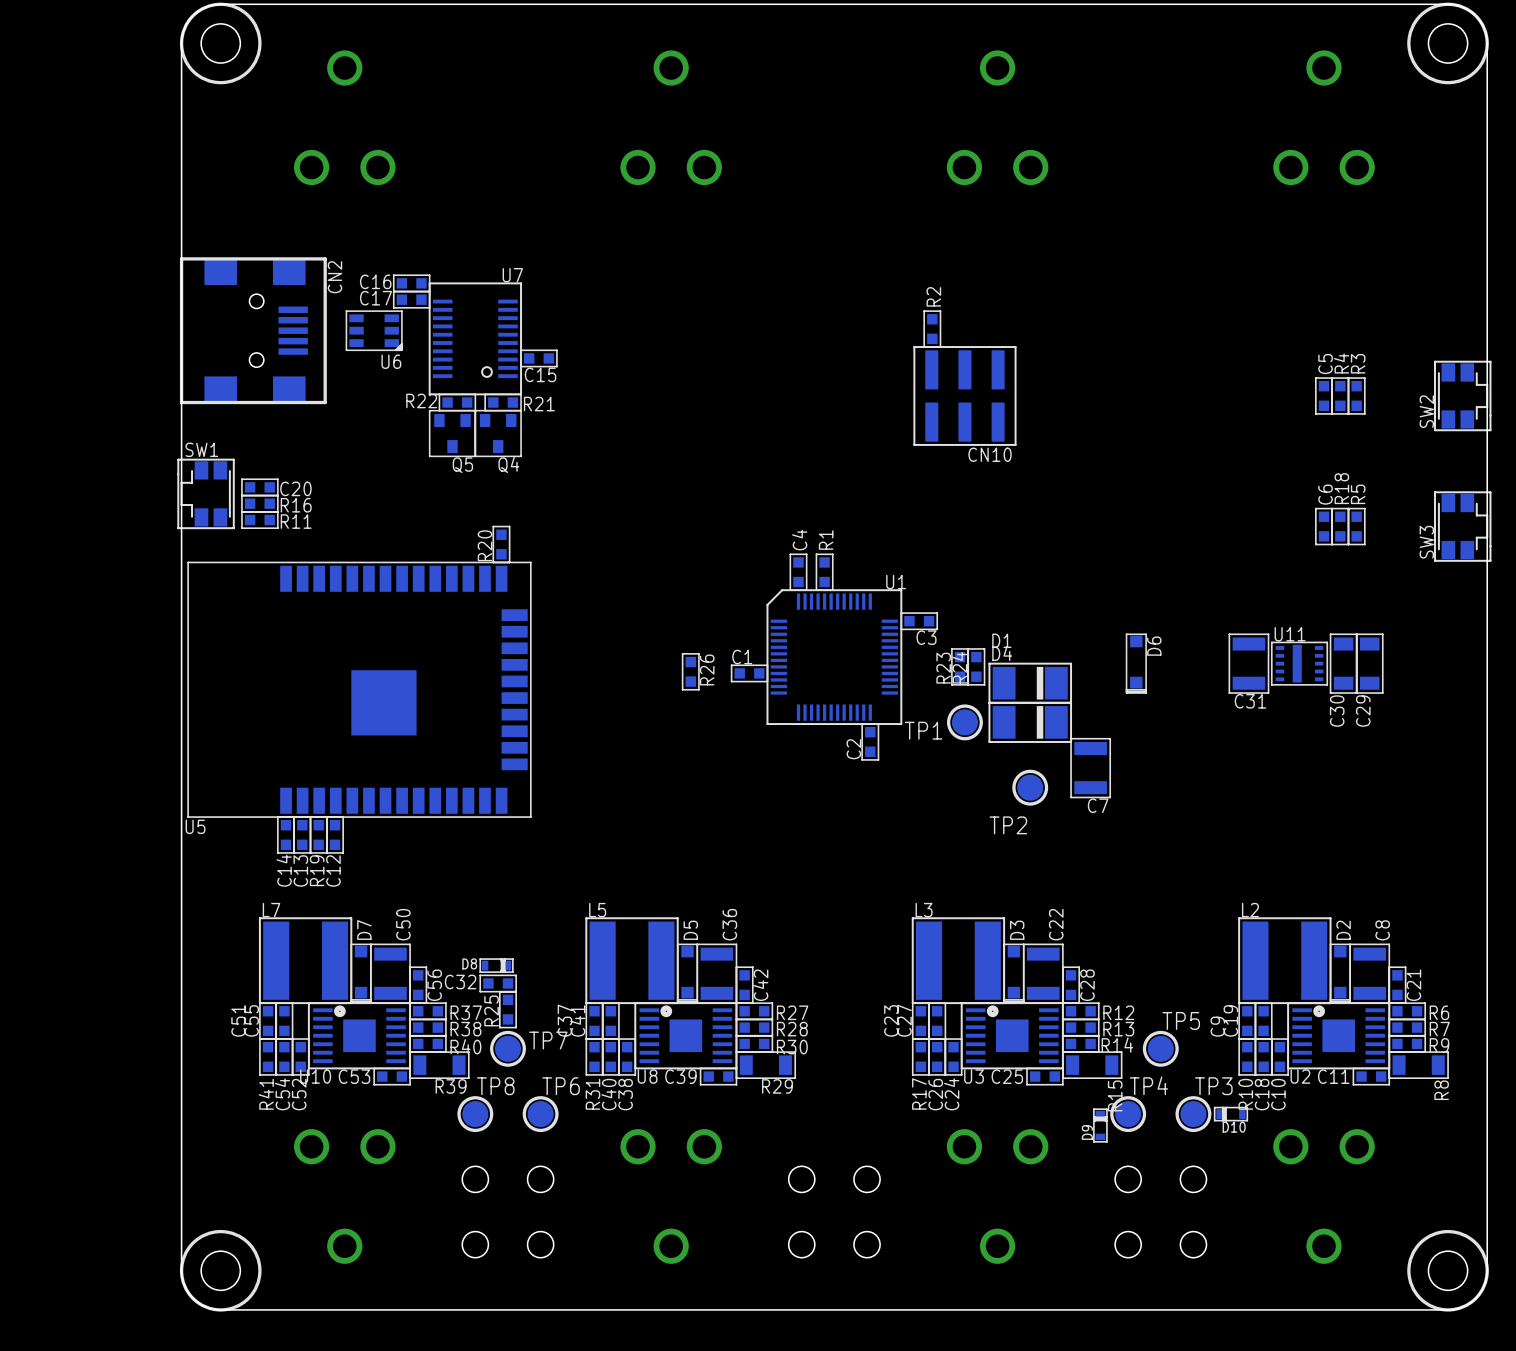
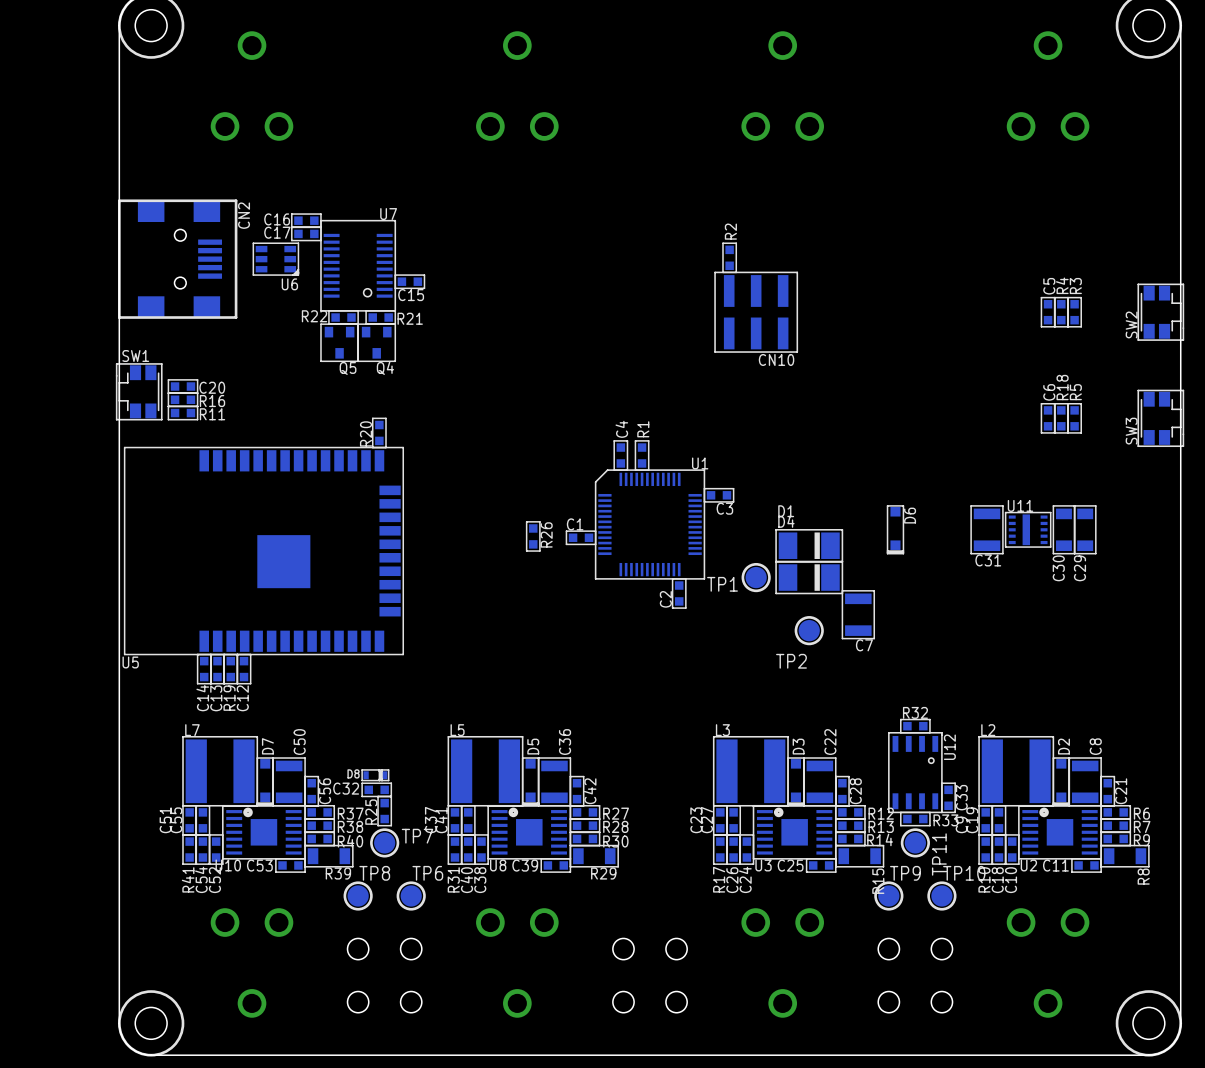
R23: (960, 666) -> none
R24: (976, 666) -> none
R32: none -> (915, 726)
U12: none -> (915, 772)
C33: none -> (948, 797)
R33: none -> (915, 819)
TP5 name: TP5 (1181, 1020) -> TP11 (939, 854)
TP4 name: TP4 (1148, 1085) -> TP9 (905, 873)
TP3 name: TP3 (1213, 1086) -> TP10 (964, 873)
D10: (1230, 1114) -> none
D9: (1100, 1125) -> none

